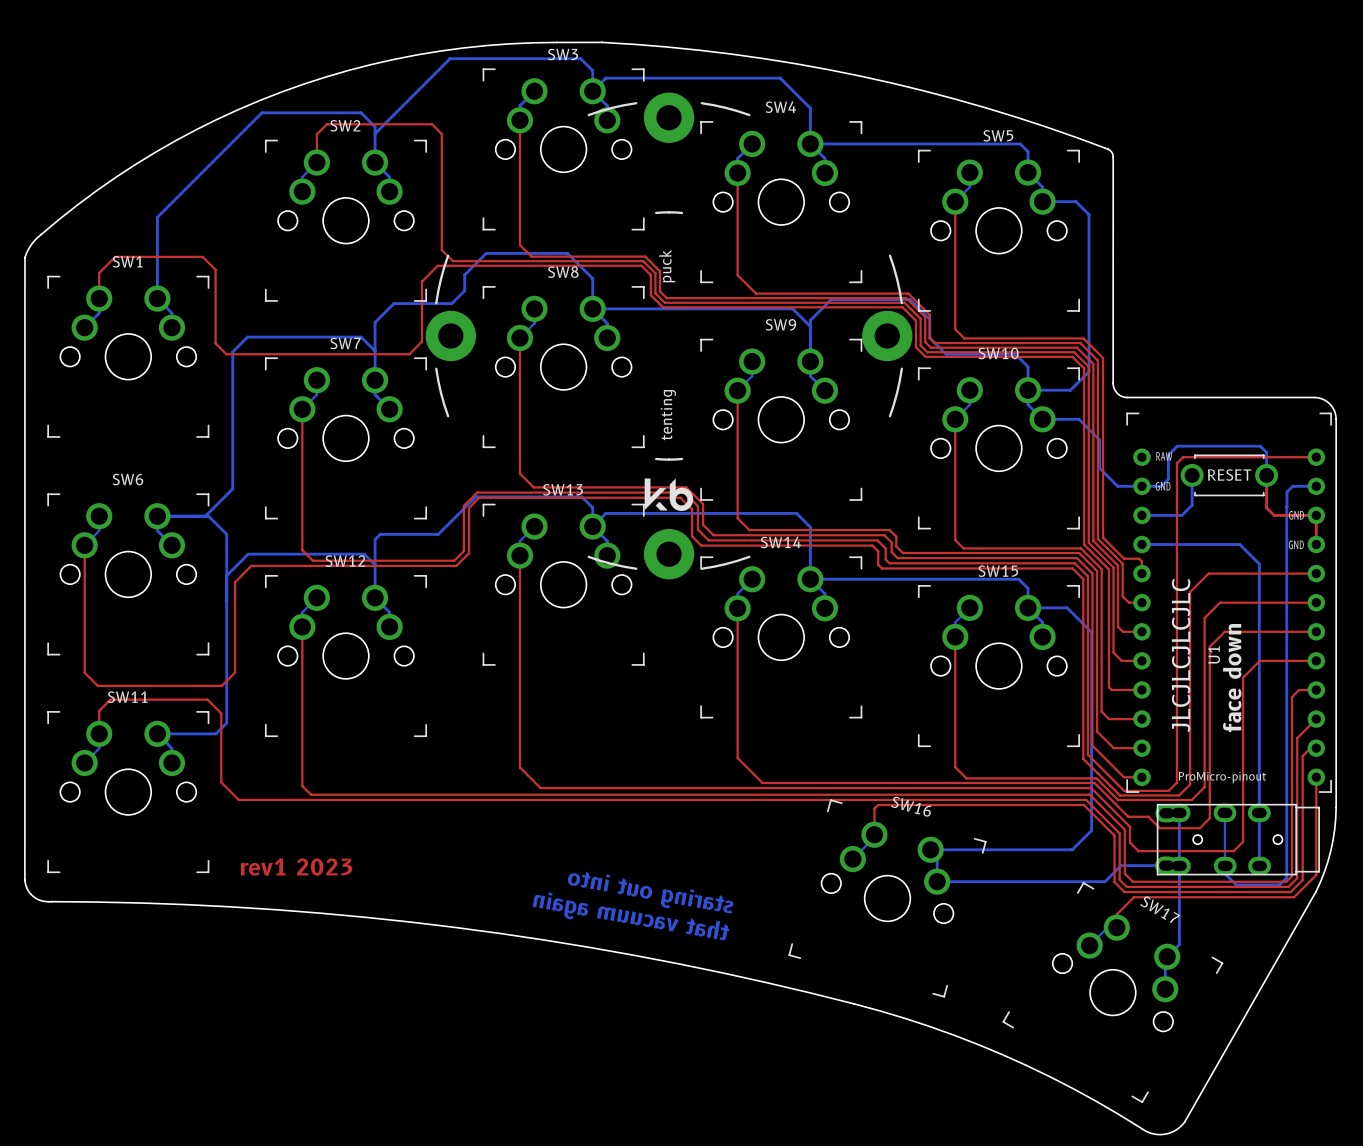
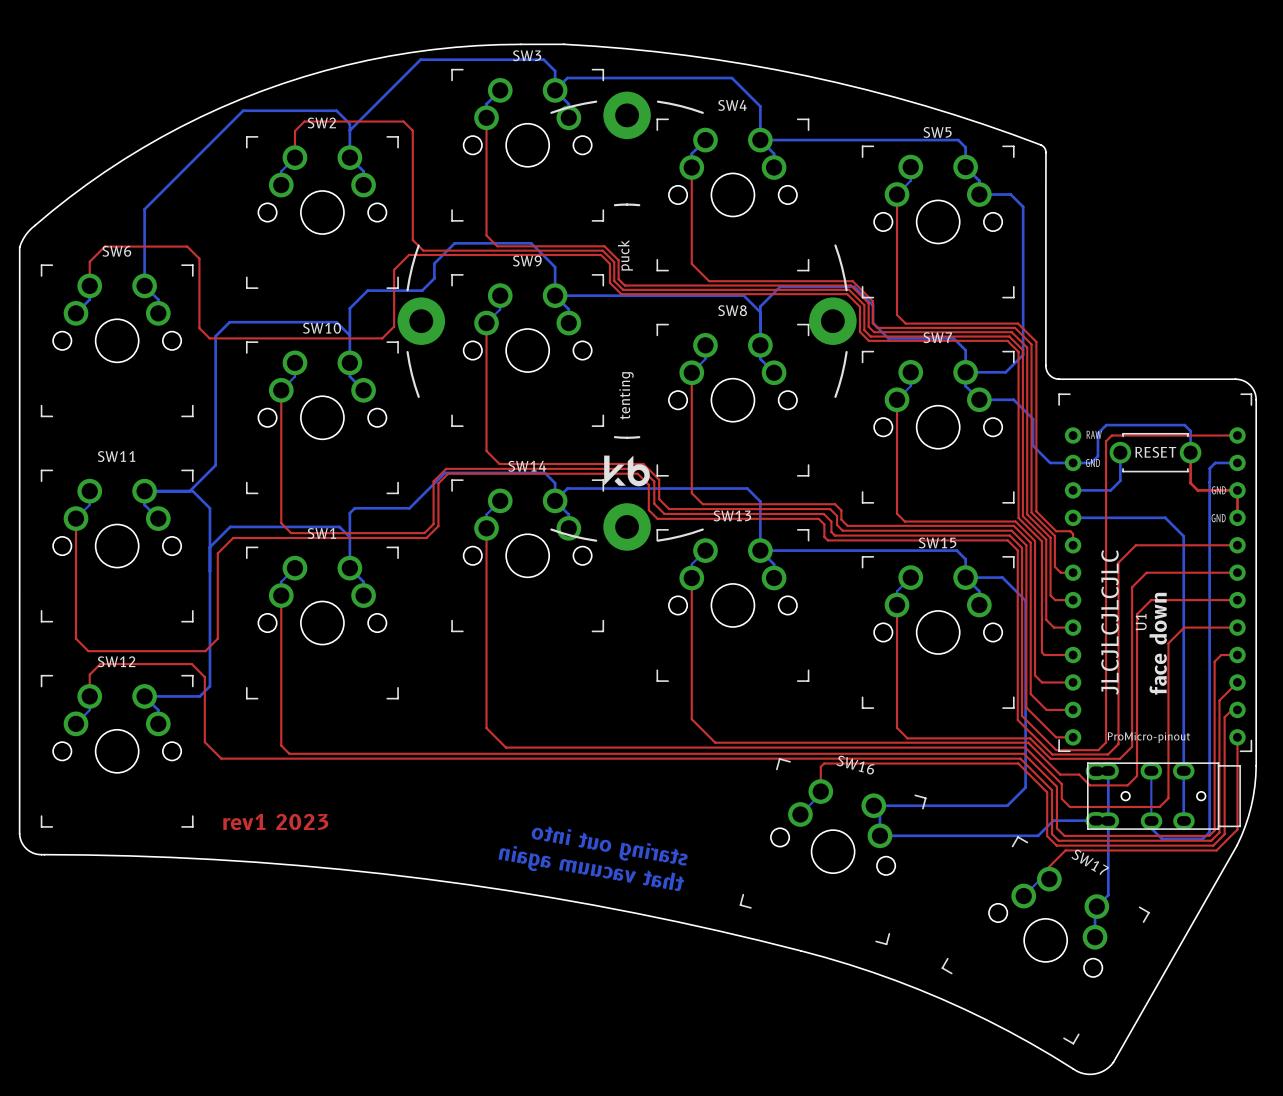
SW1 name: SW1 (127, 261) -> SW6 (116, 251)
SW8 name: SW8 (563, 272) -> SW9 (527, 260)
SW9 name: SW9 (780, 324) -> SW8 (732, 310)
SW7 name: SW7 (345, 343) -> SW10 (322, 328)
SW10 name: SW10 (998, 353) -> SW7 (937, 337)
SW6 name: SW6 (127, 479) -> SW11 (116, 456)
SW13 name: SW13 (563, 489) -> SW14 (527, 466)
SW14 name: SW14 (780, 542) -> SW13 (732, 515)
SW12 name: SW12 (345, 561) -> SW1 (321, 533)
SW11 name: SW11 (127, 697) -> SW12 (116, 661)

